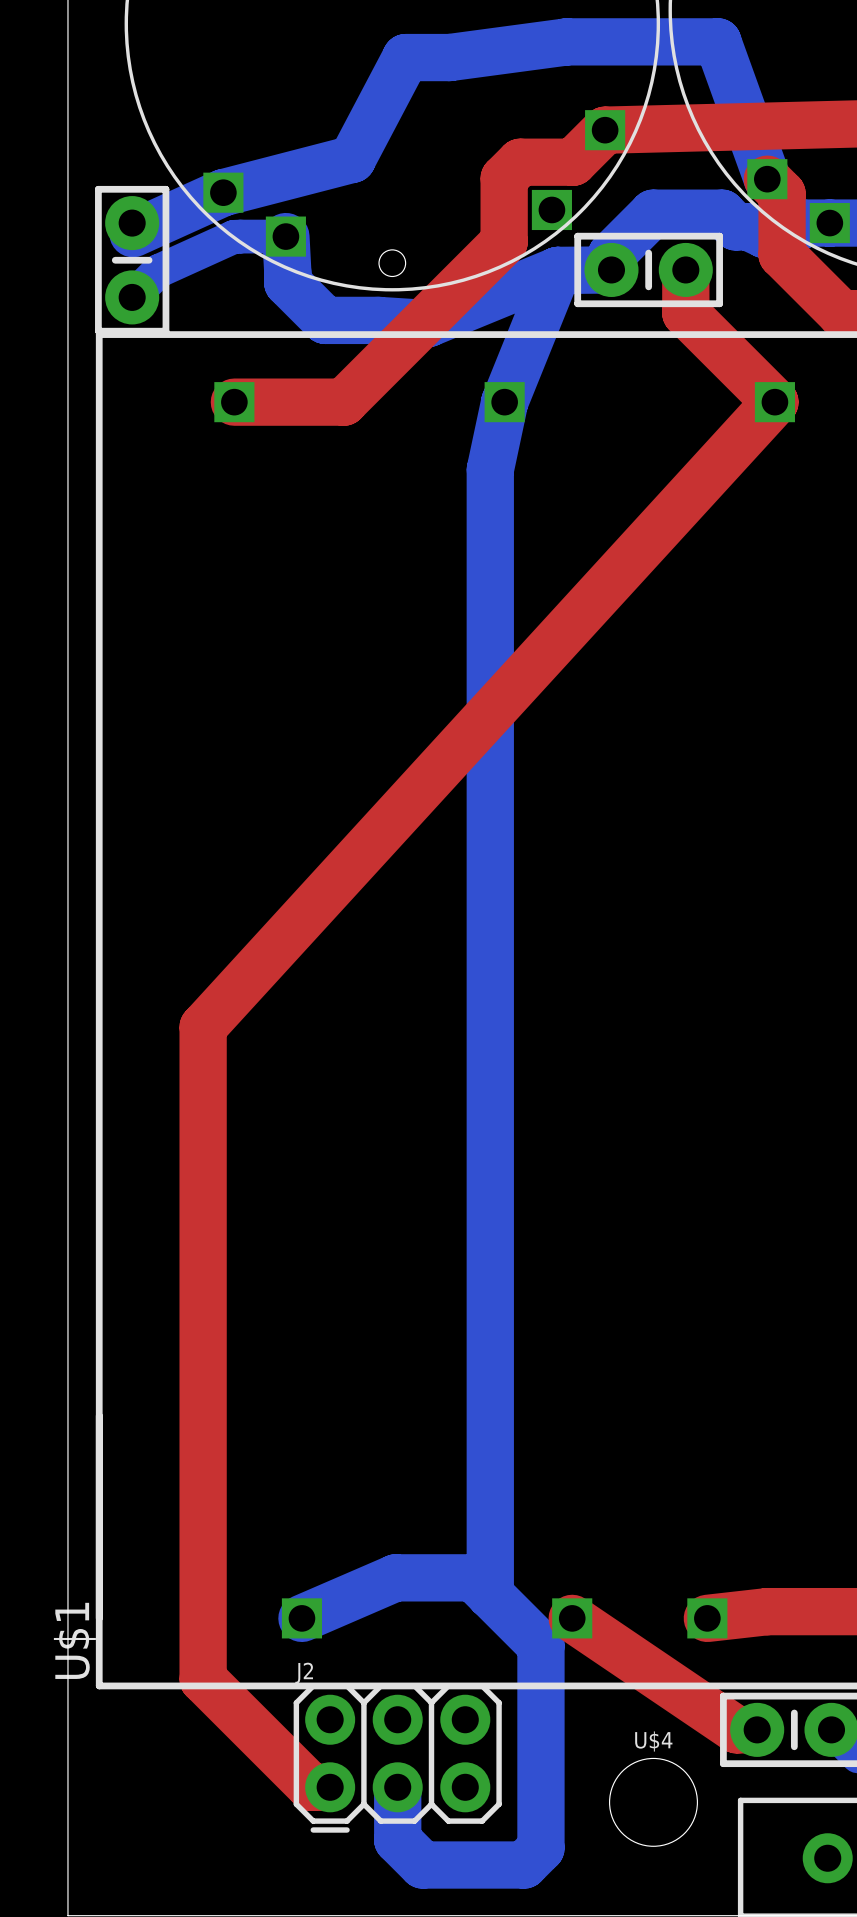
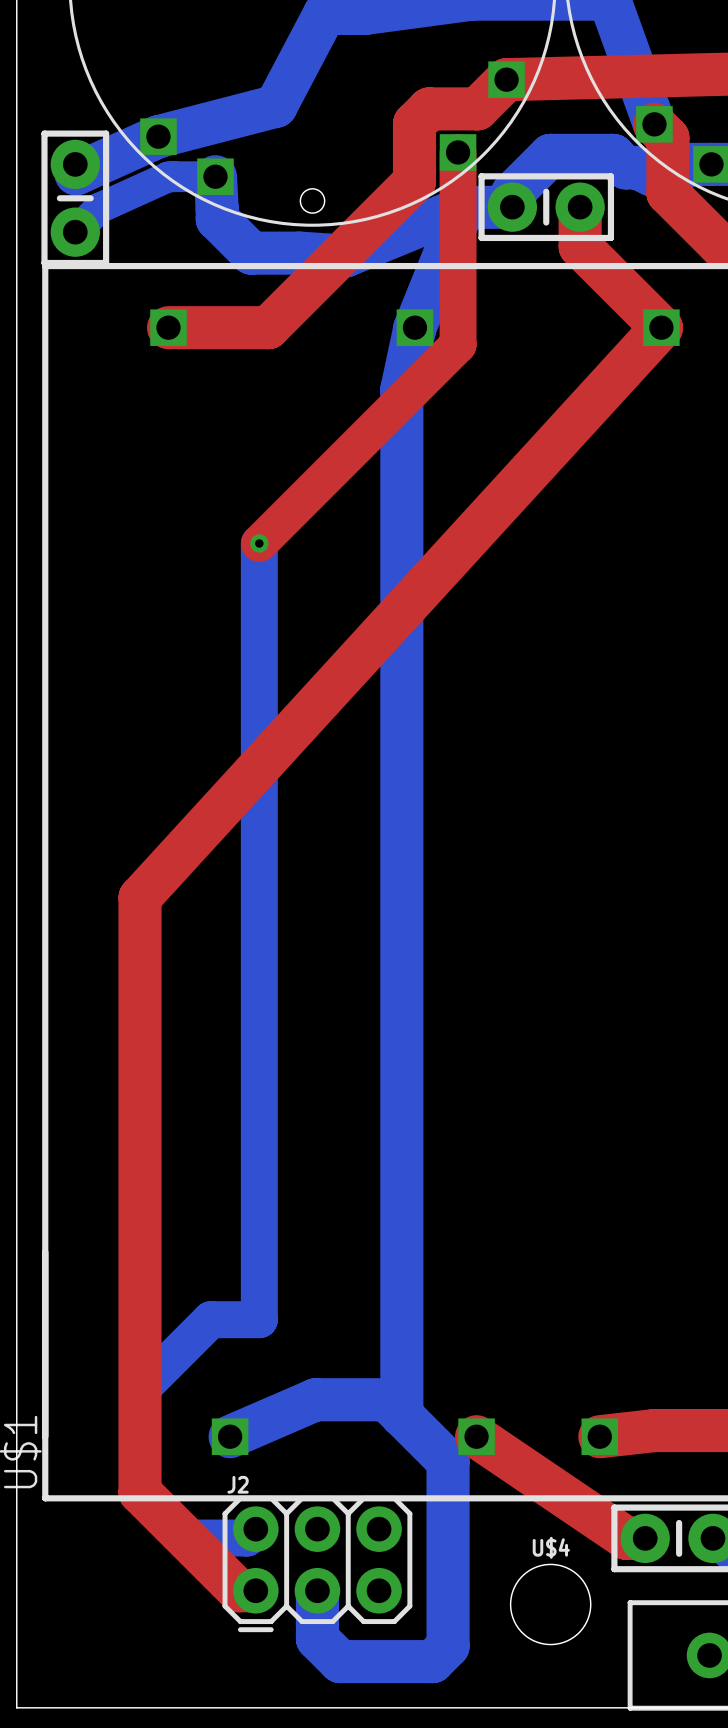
top track: none -> (458, 152) (458, 344) (259, 543)
bottom track: none -> (259, 543) (259, 1319) (210, 1319) (138, 1392) (138, 1489) (186, 1538) (246, 1538) (255, 1529)
via: none -> (259, 543)

